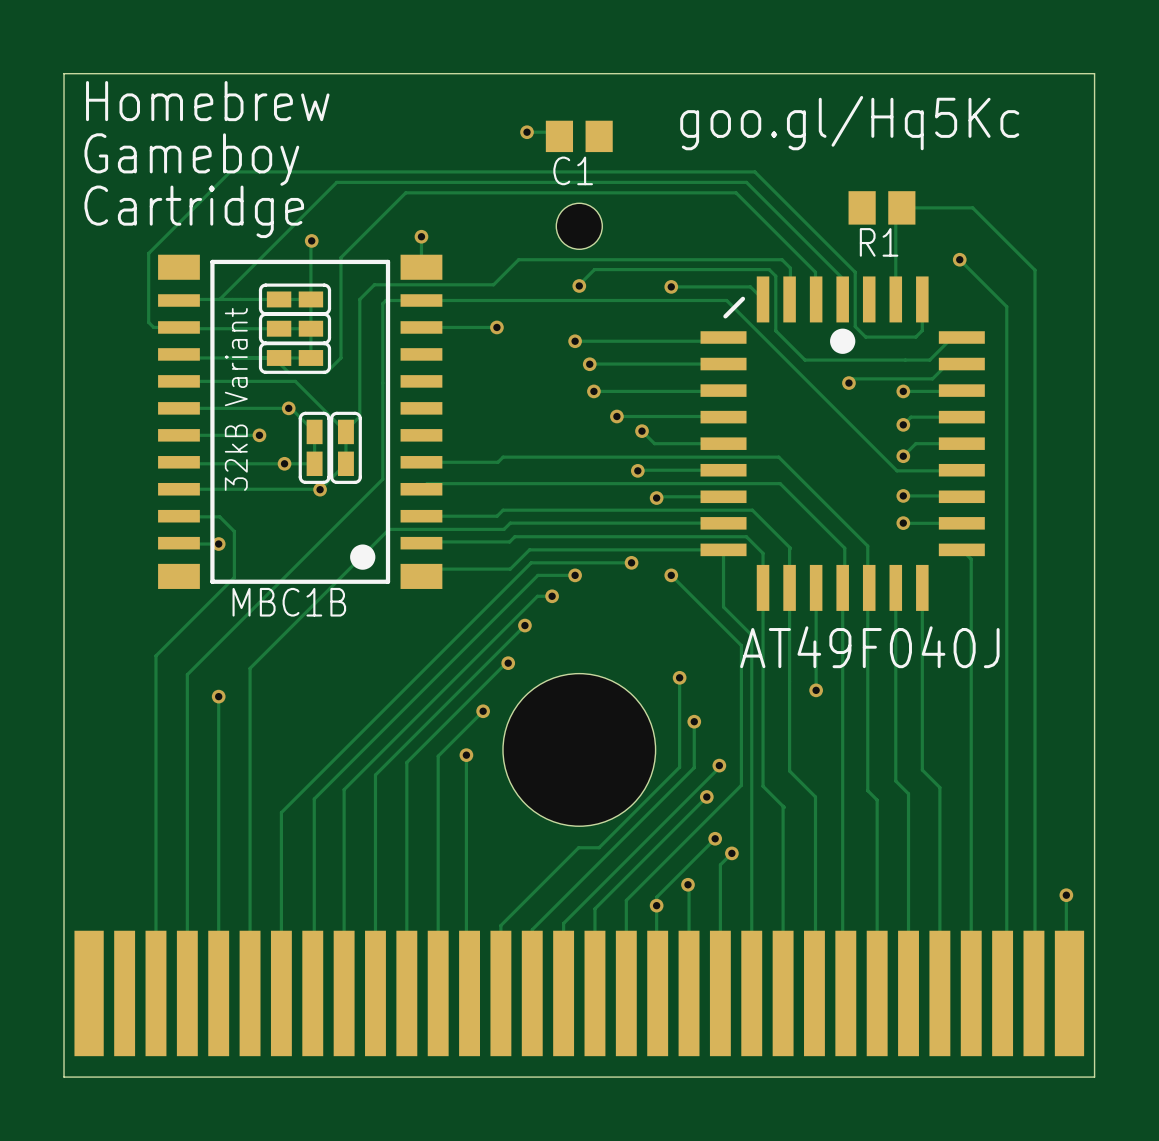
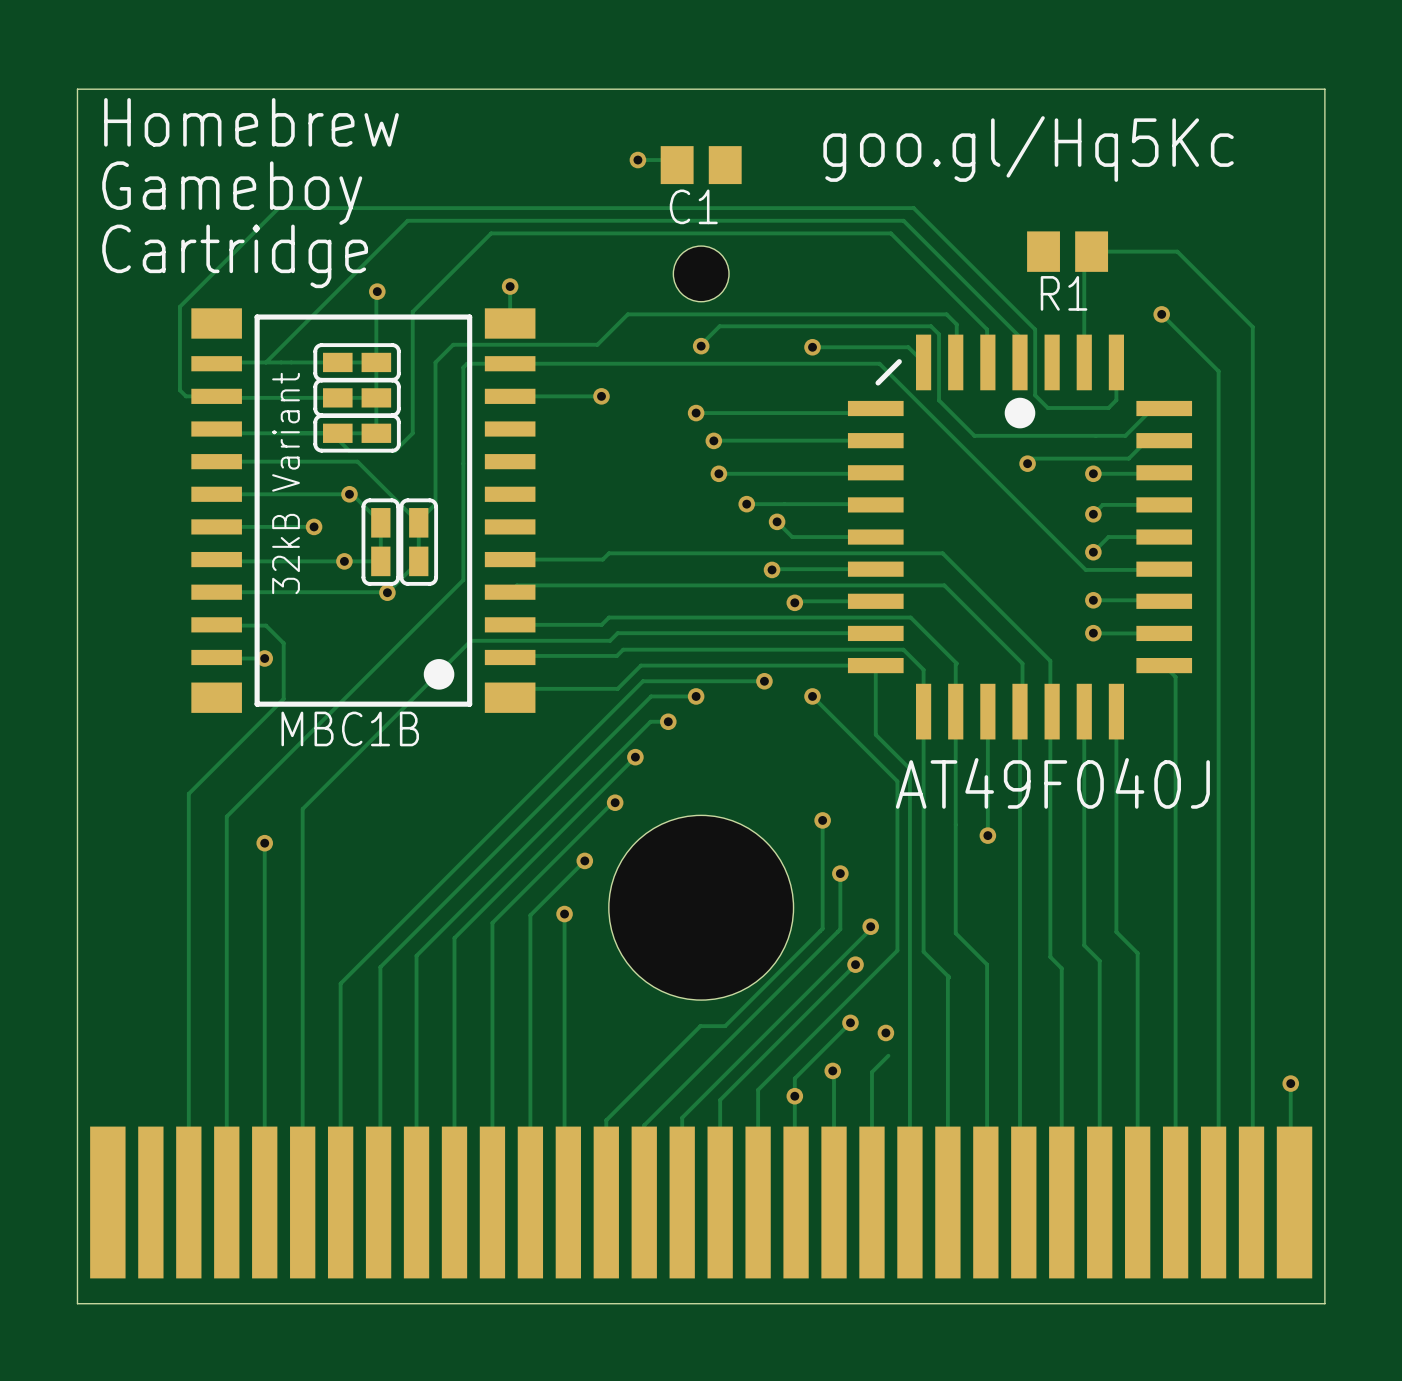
track: (715, 838) (656, 897) -> (850, 1022) (794, 1078) (794, 1086)
via position: (715, 838) -> (850, 1022)
track: (731, 853) (720, 864) (720, 885) -> (888, 1055) (871, 1072)

